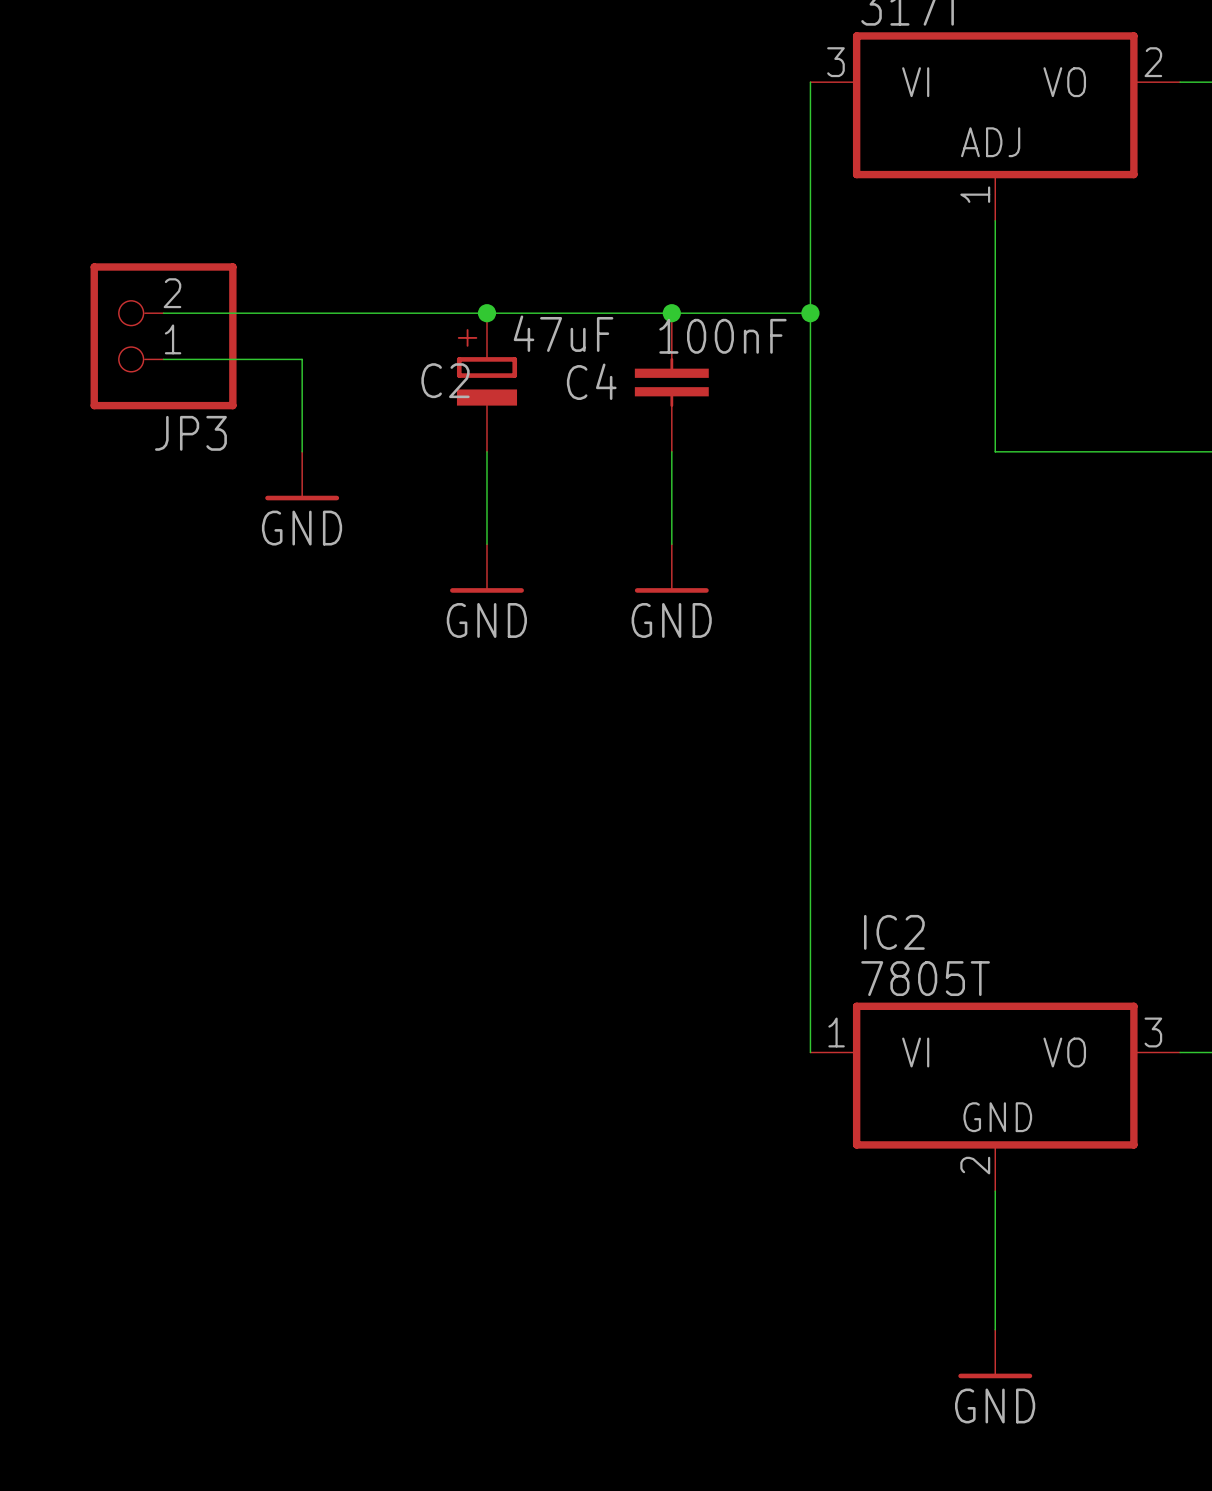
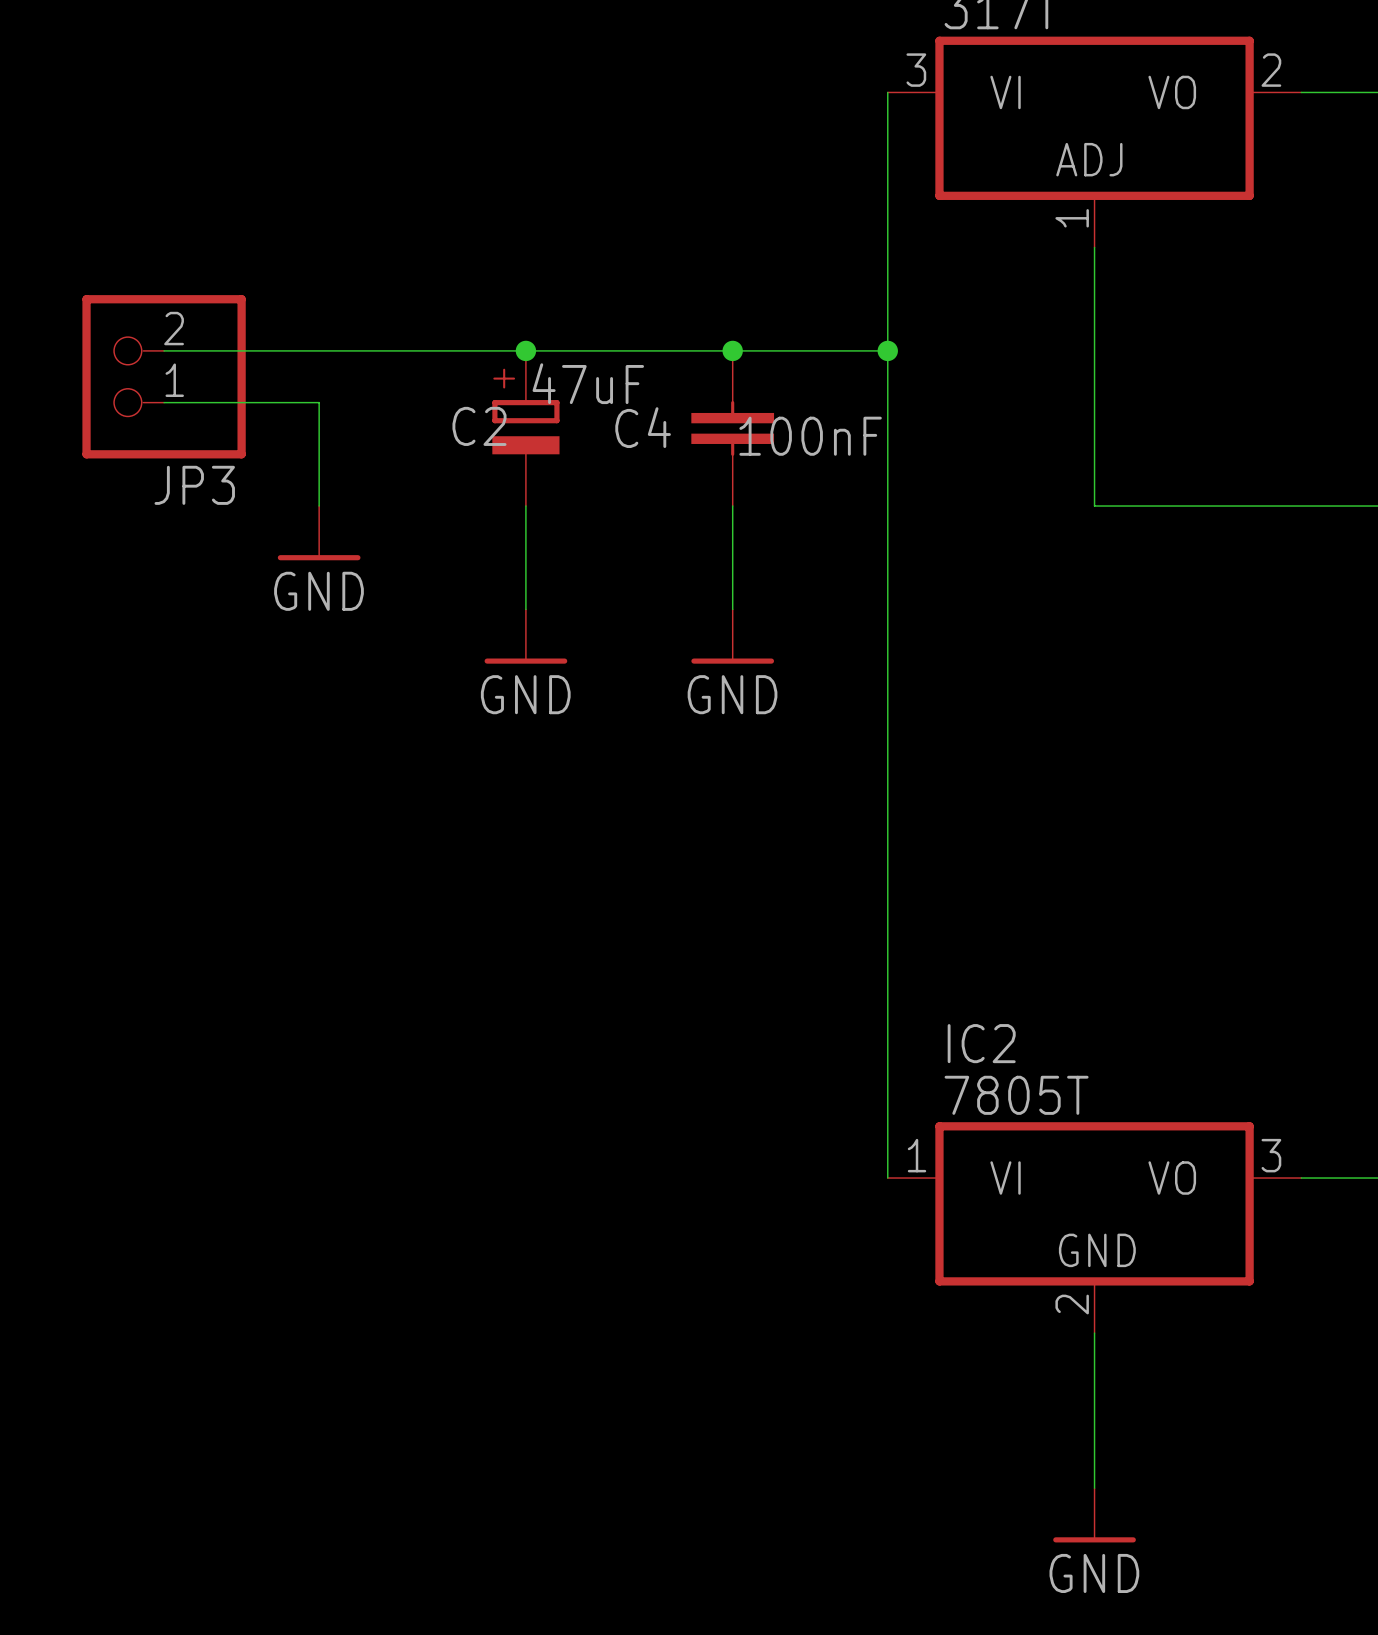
C2 value: 47uF (563, 333) -> none
C4 value: 100nF (722, 336) -> none
C2 text: none -> 47uF (588, 383)
C4 text: none -> 100nF (810, 436)

